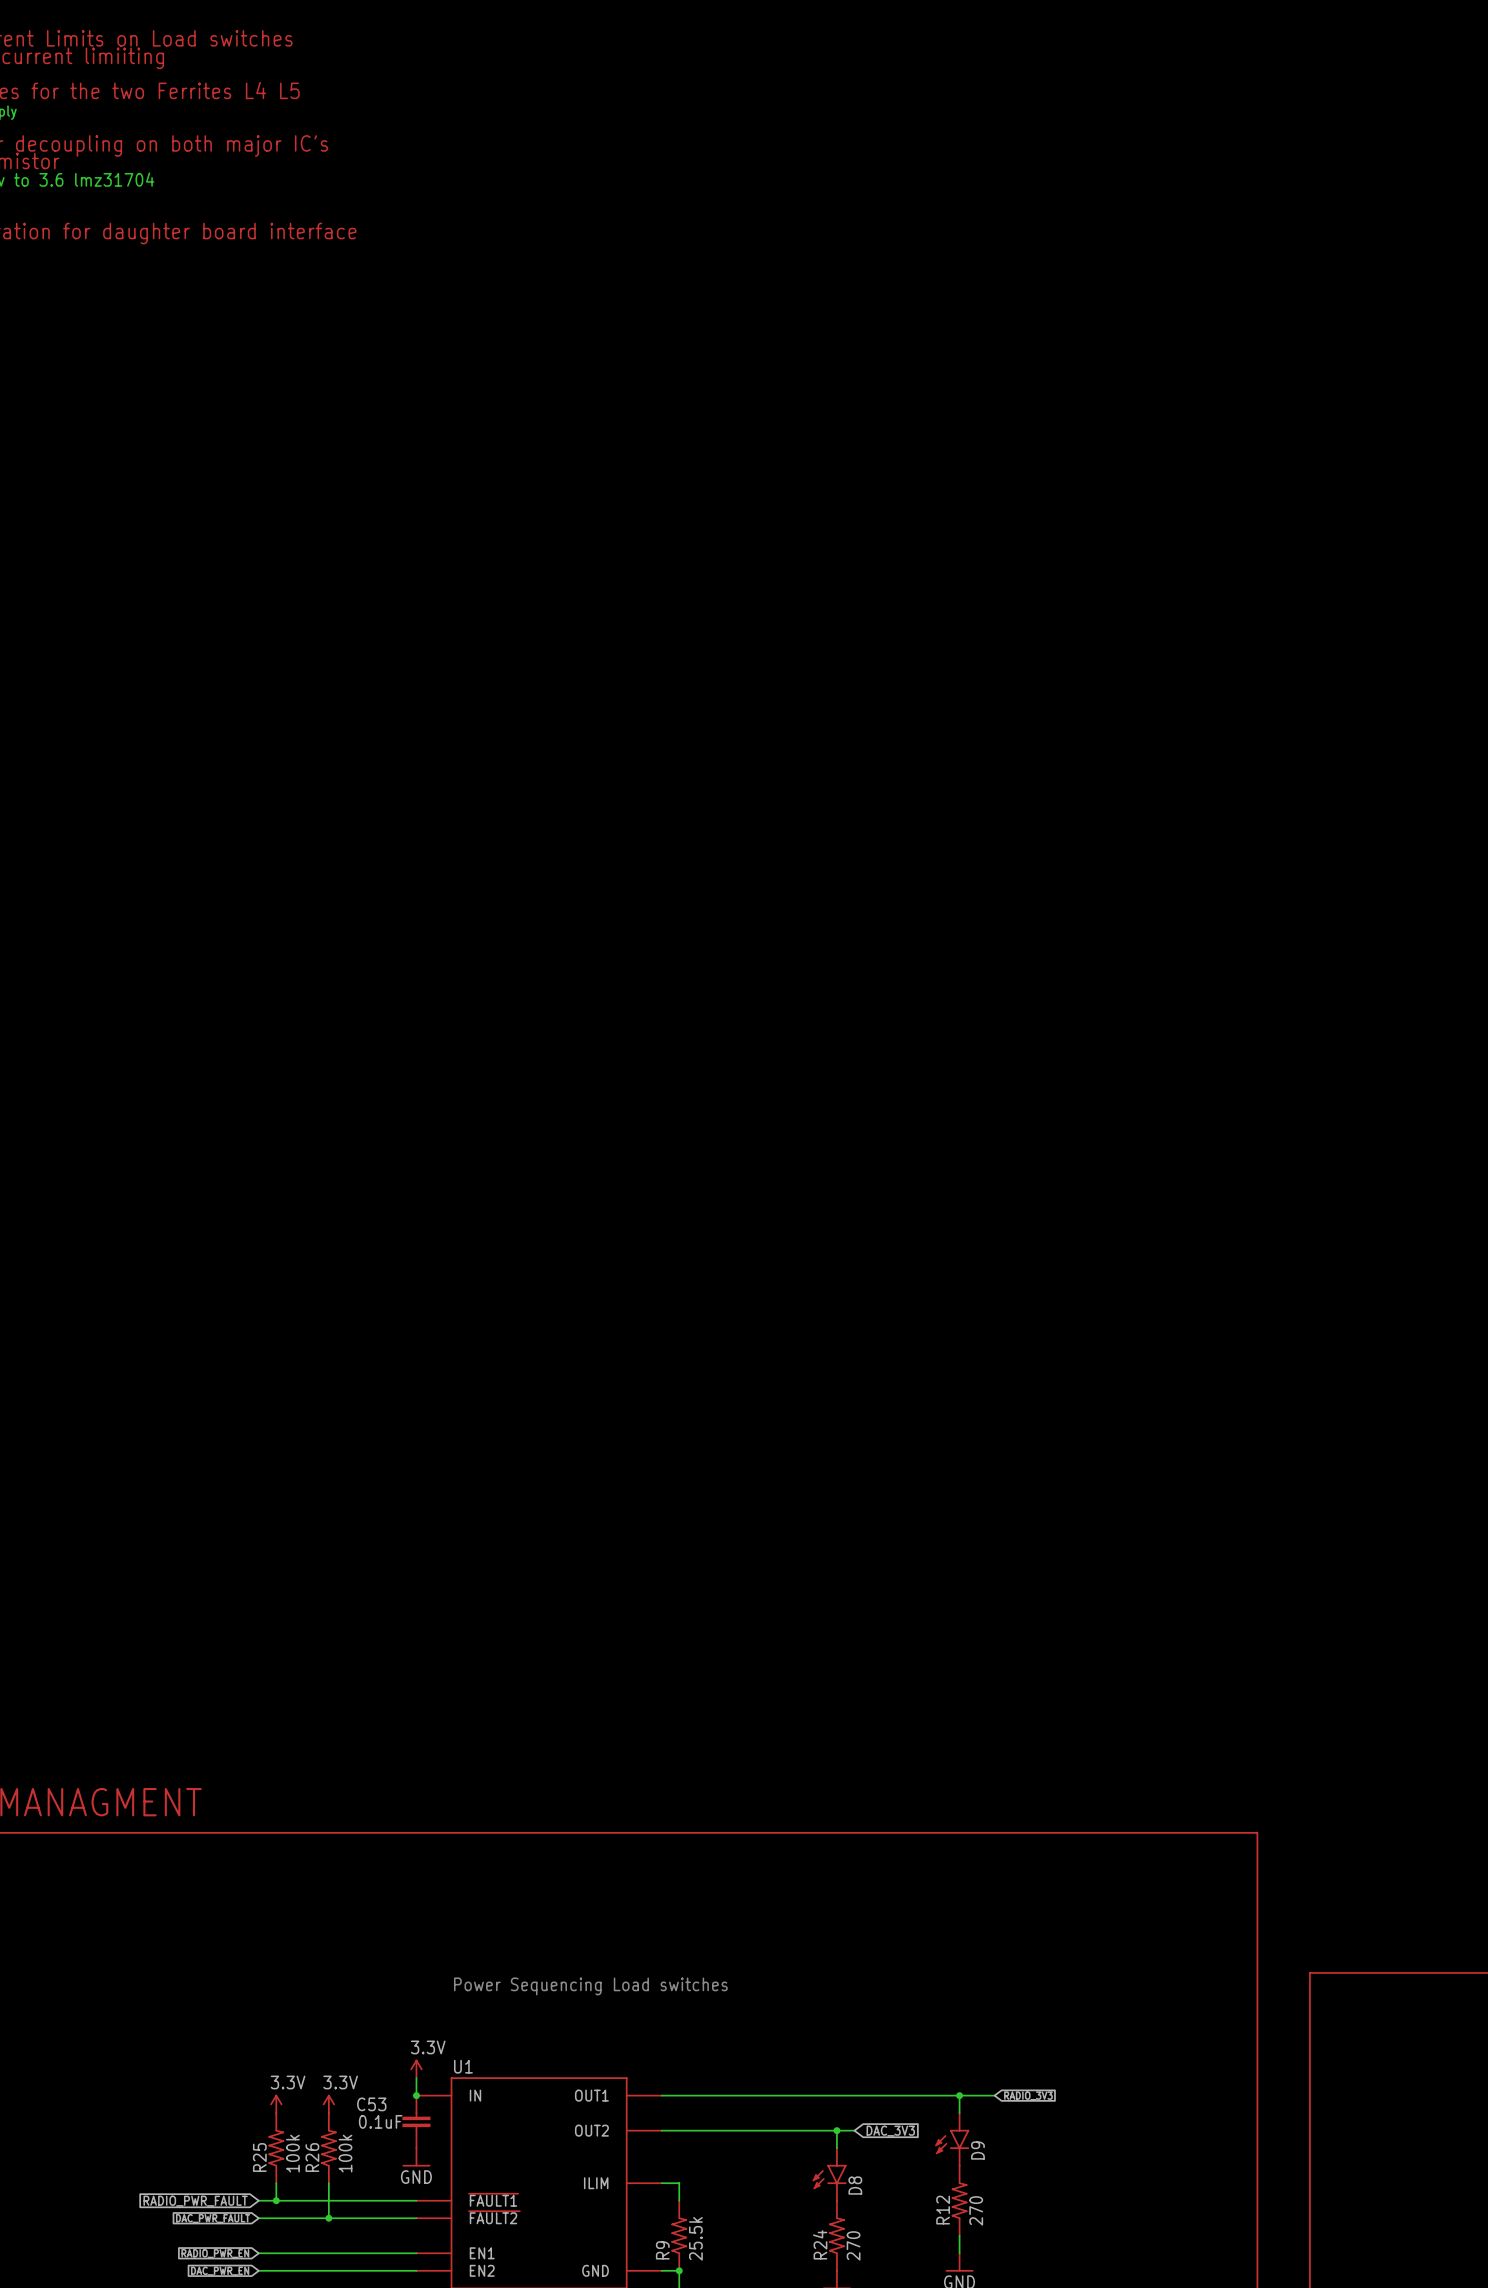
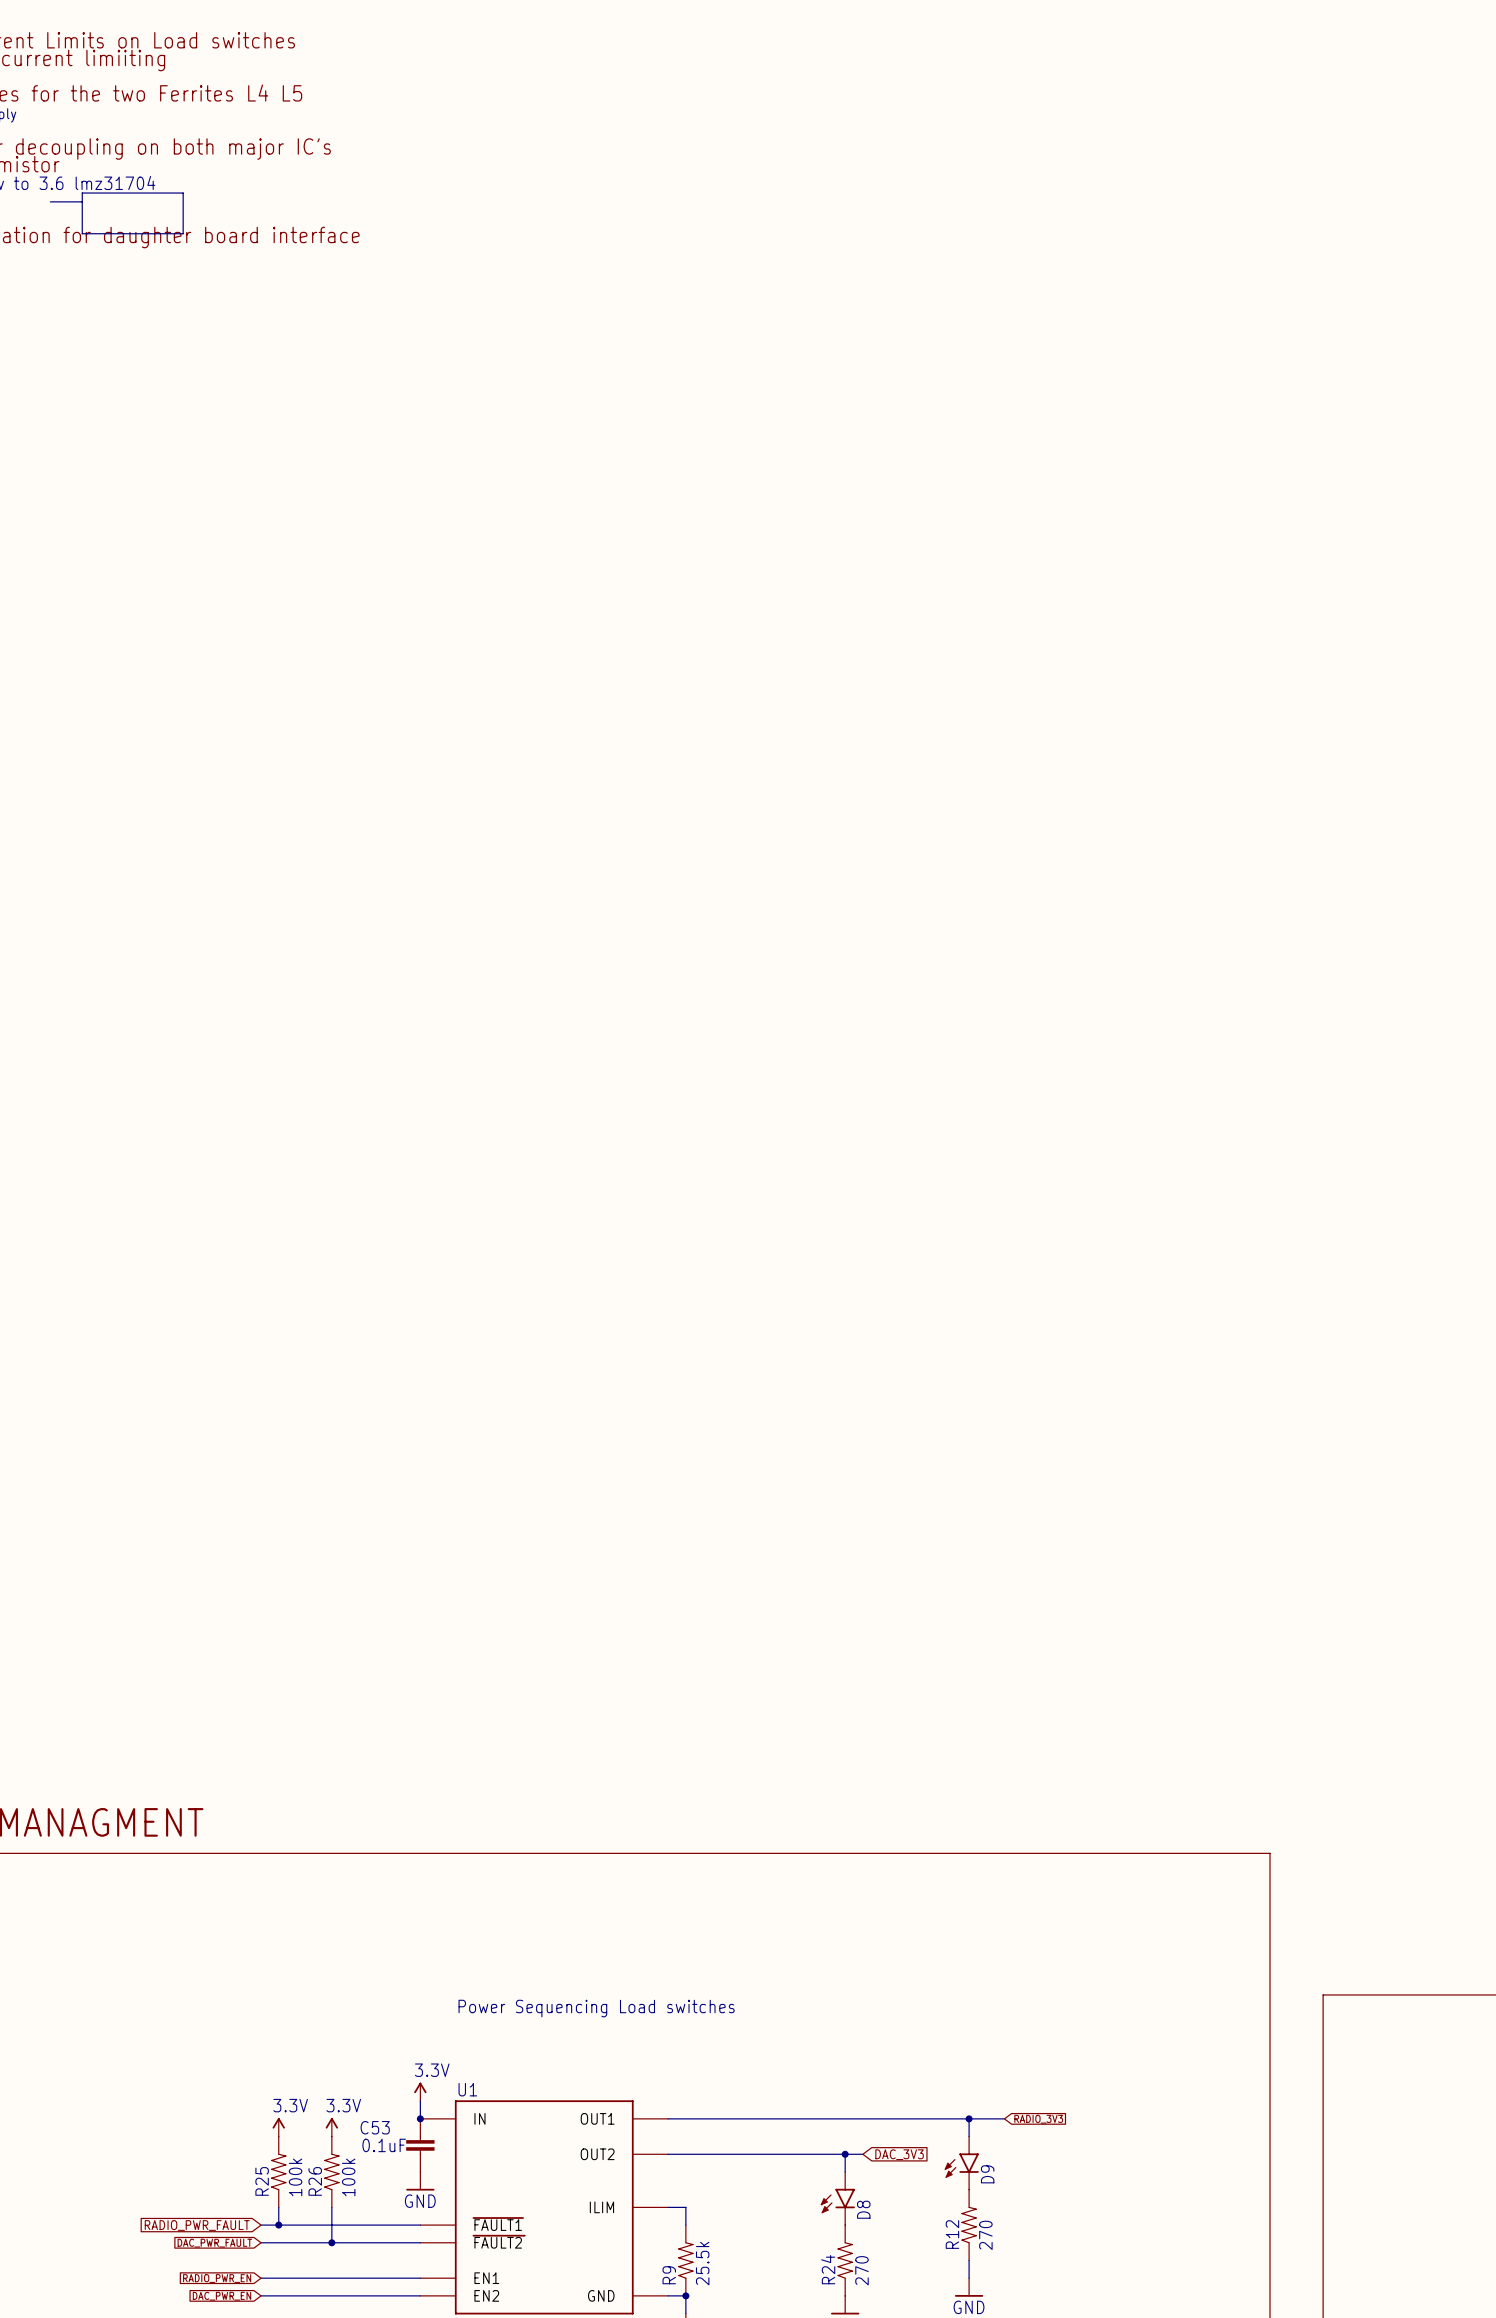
wire: none -> (82, 193) (82, 233) (183, 233) (183, 193) (82, 193)
wire: none -> (50, 201) (82, 201)

